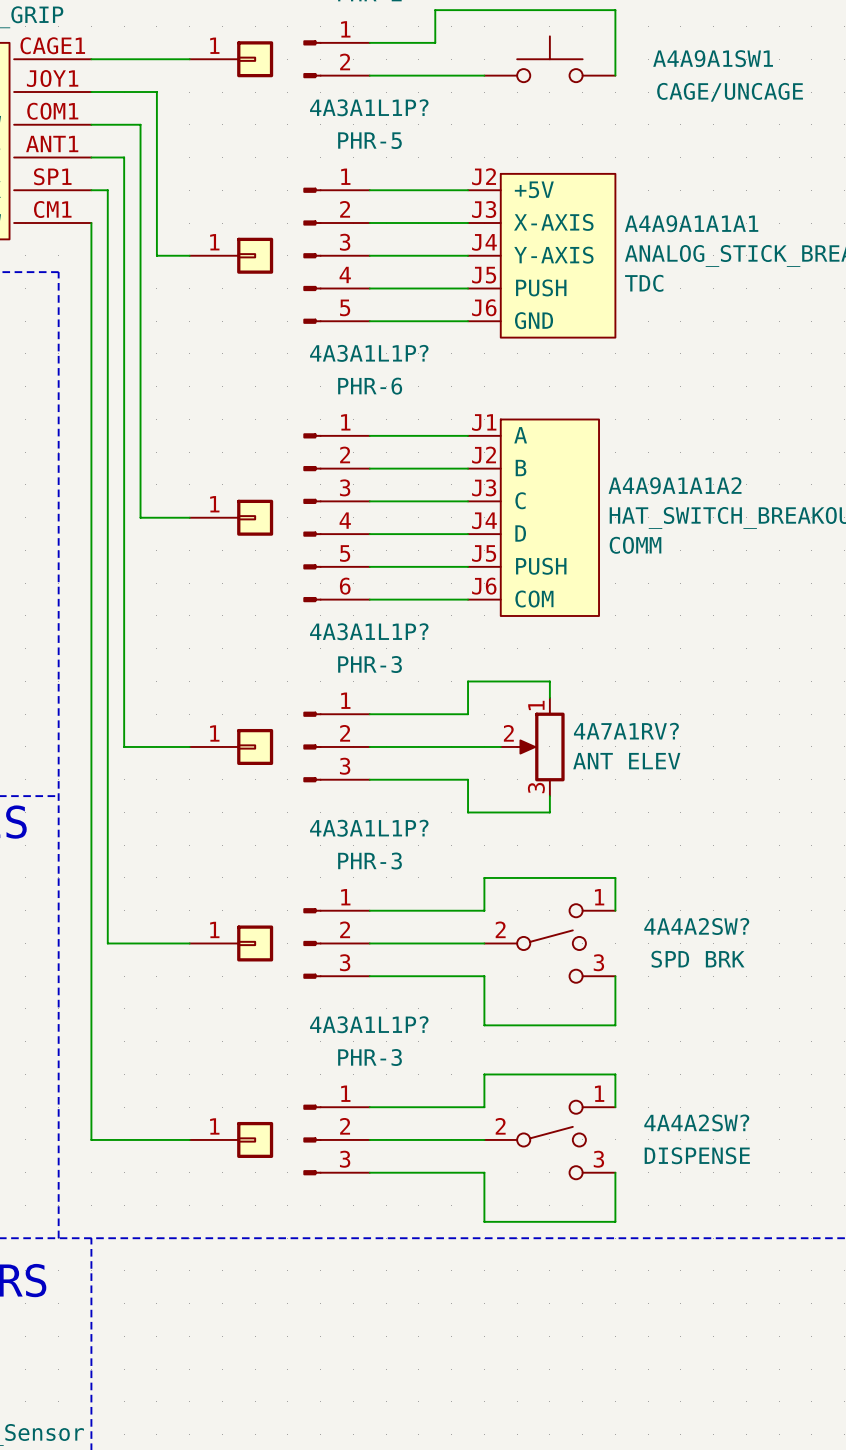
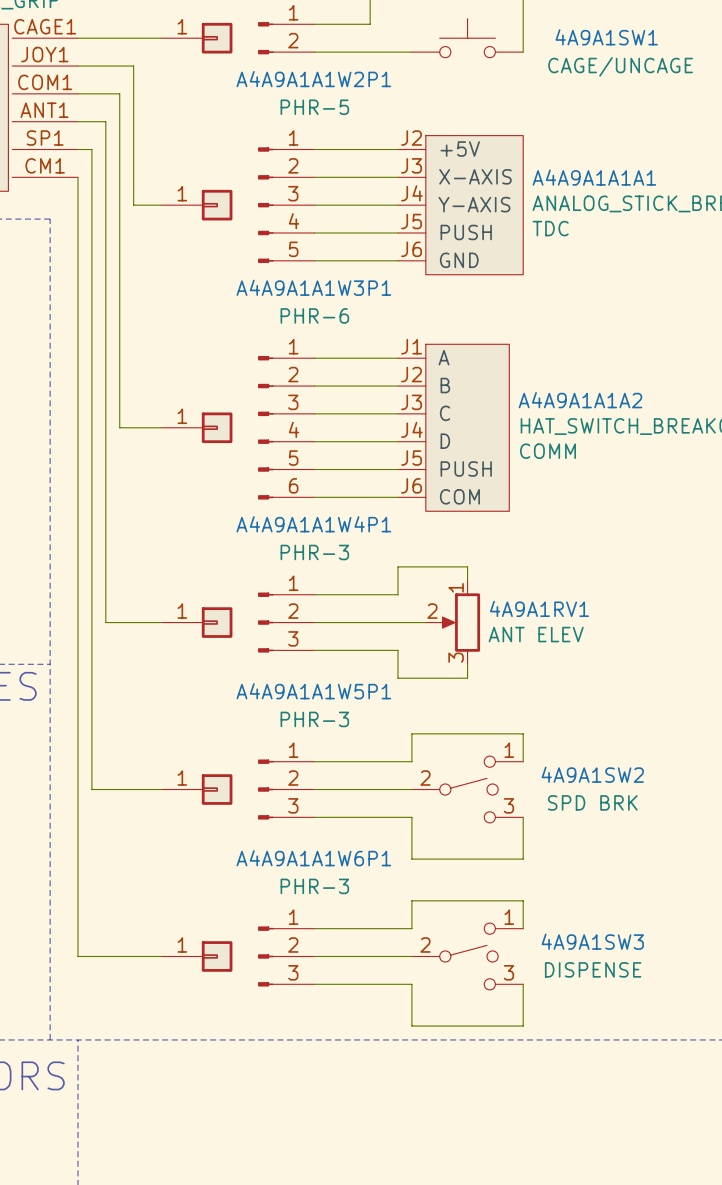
A4A9A1SW1 name: A4A9A1SW1 (713, 58) -> 4A9A1SW1 (606, 37)
4A3A1L1P? name: 4A3A1L1P? (369, 107) -> A4A9A1A1W2P1 (313, 79)
4A3A1L1P? name: 4A3A1L1P? (369, 353) -> A4A9A1A1W3P1 (313, 287)
4A3A1L1P? name: 4A3A1L1P? (369, 631) -> A4A9A1A1W4P1 (313, 524)
4A7A1RV? name: 4A7A1RV? (626, 731) -> 4A9A1RV1 (539, 608)
4A3A1L1P? name: 4A3A1L1P? (369, 828) -> A4A9A1A1W5P1 (313, 691)
4A4A2SW? name: 4A4A2SW? (696, 926) -> 4A9A1SW2 (592, 774)
4A3A1L1P? name: 4A3A1L1P? (369, 1024) -> A4A9A1A1W6P1 (313, 858)
4A4A2SW? name: 4A4A2SW? (696, 1123) -> 4A9A1SW3 (592, 941)

